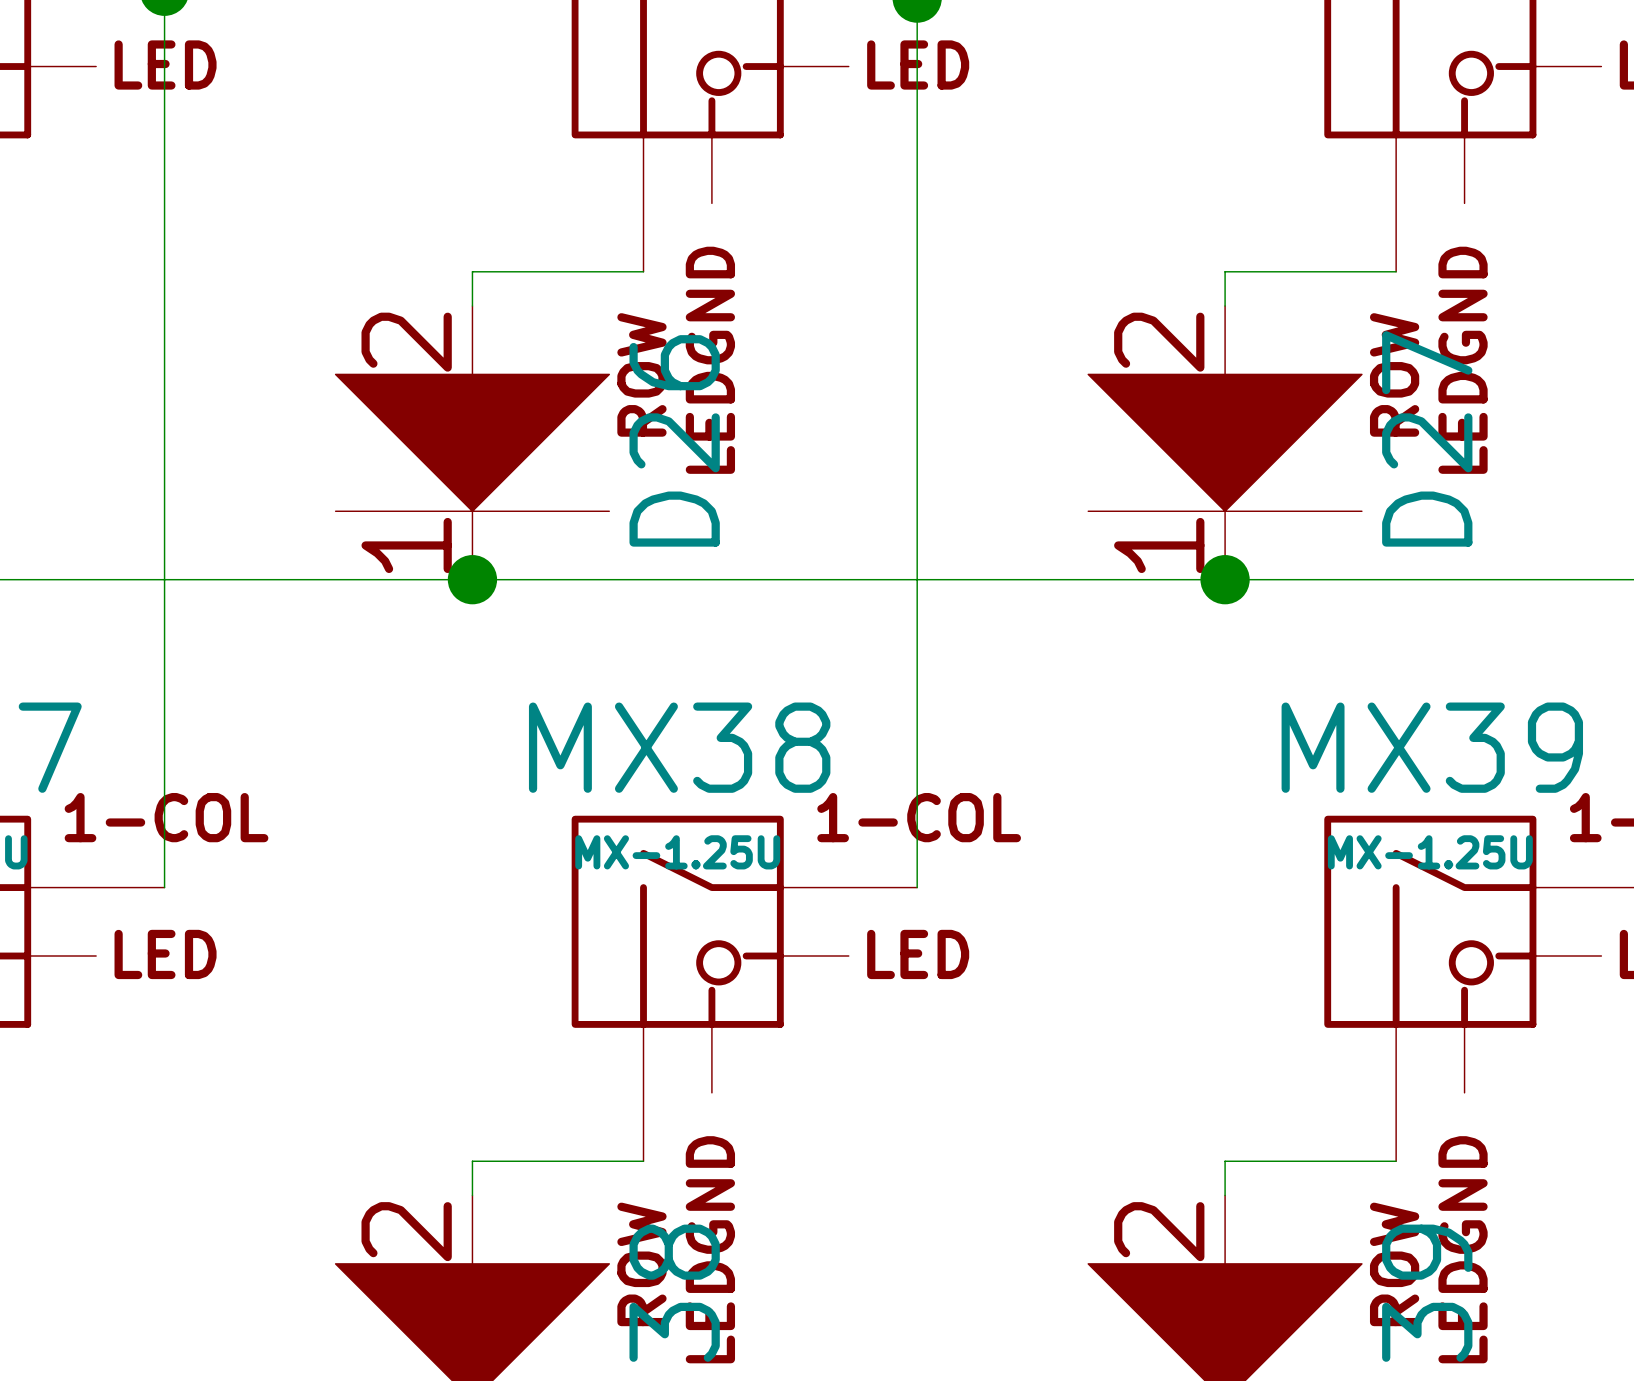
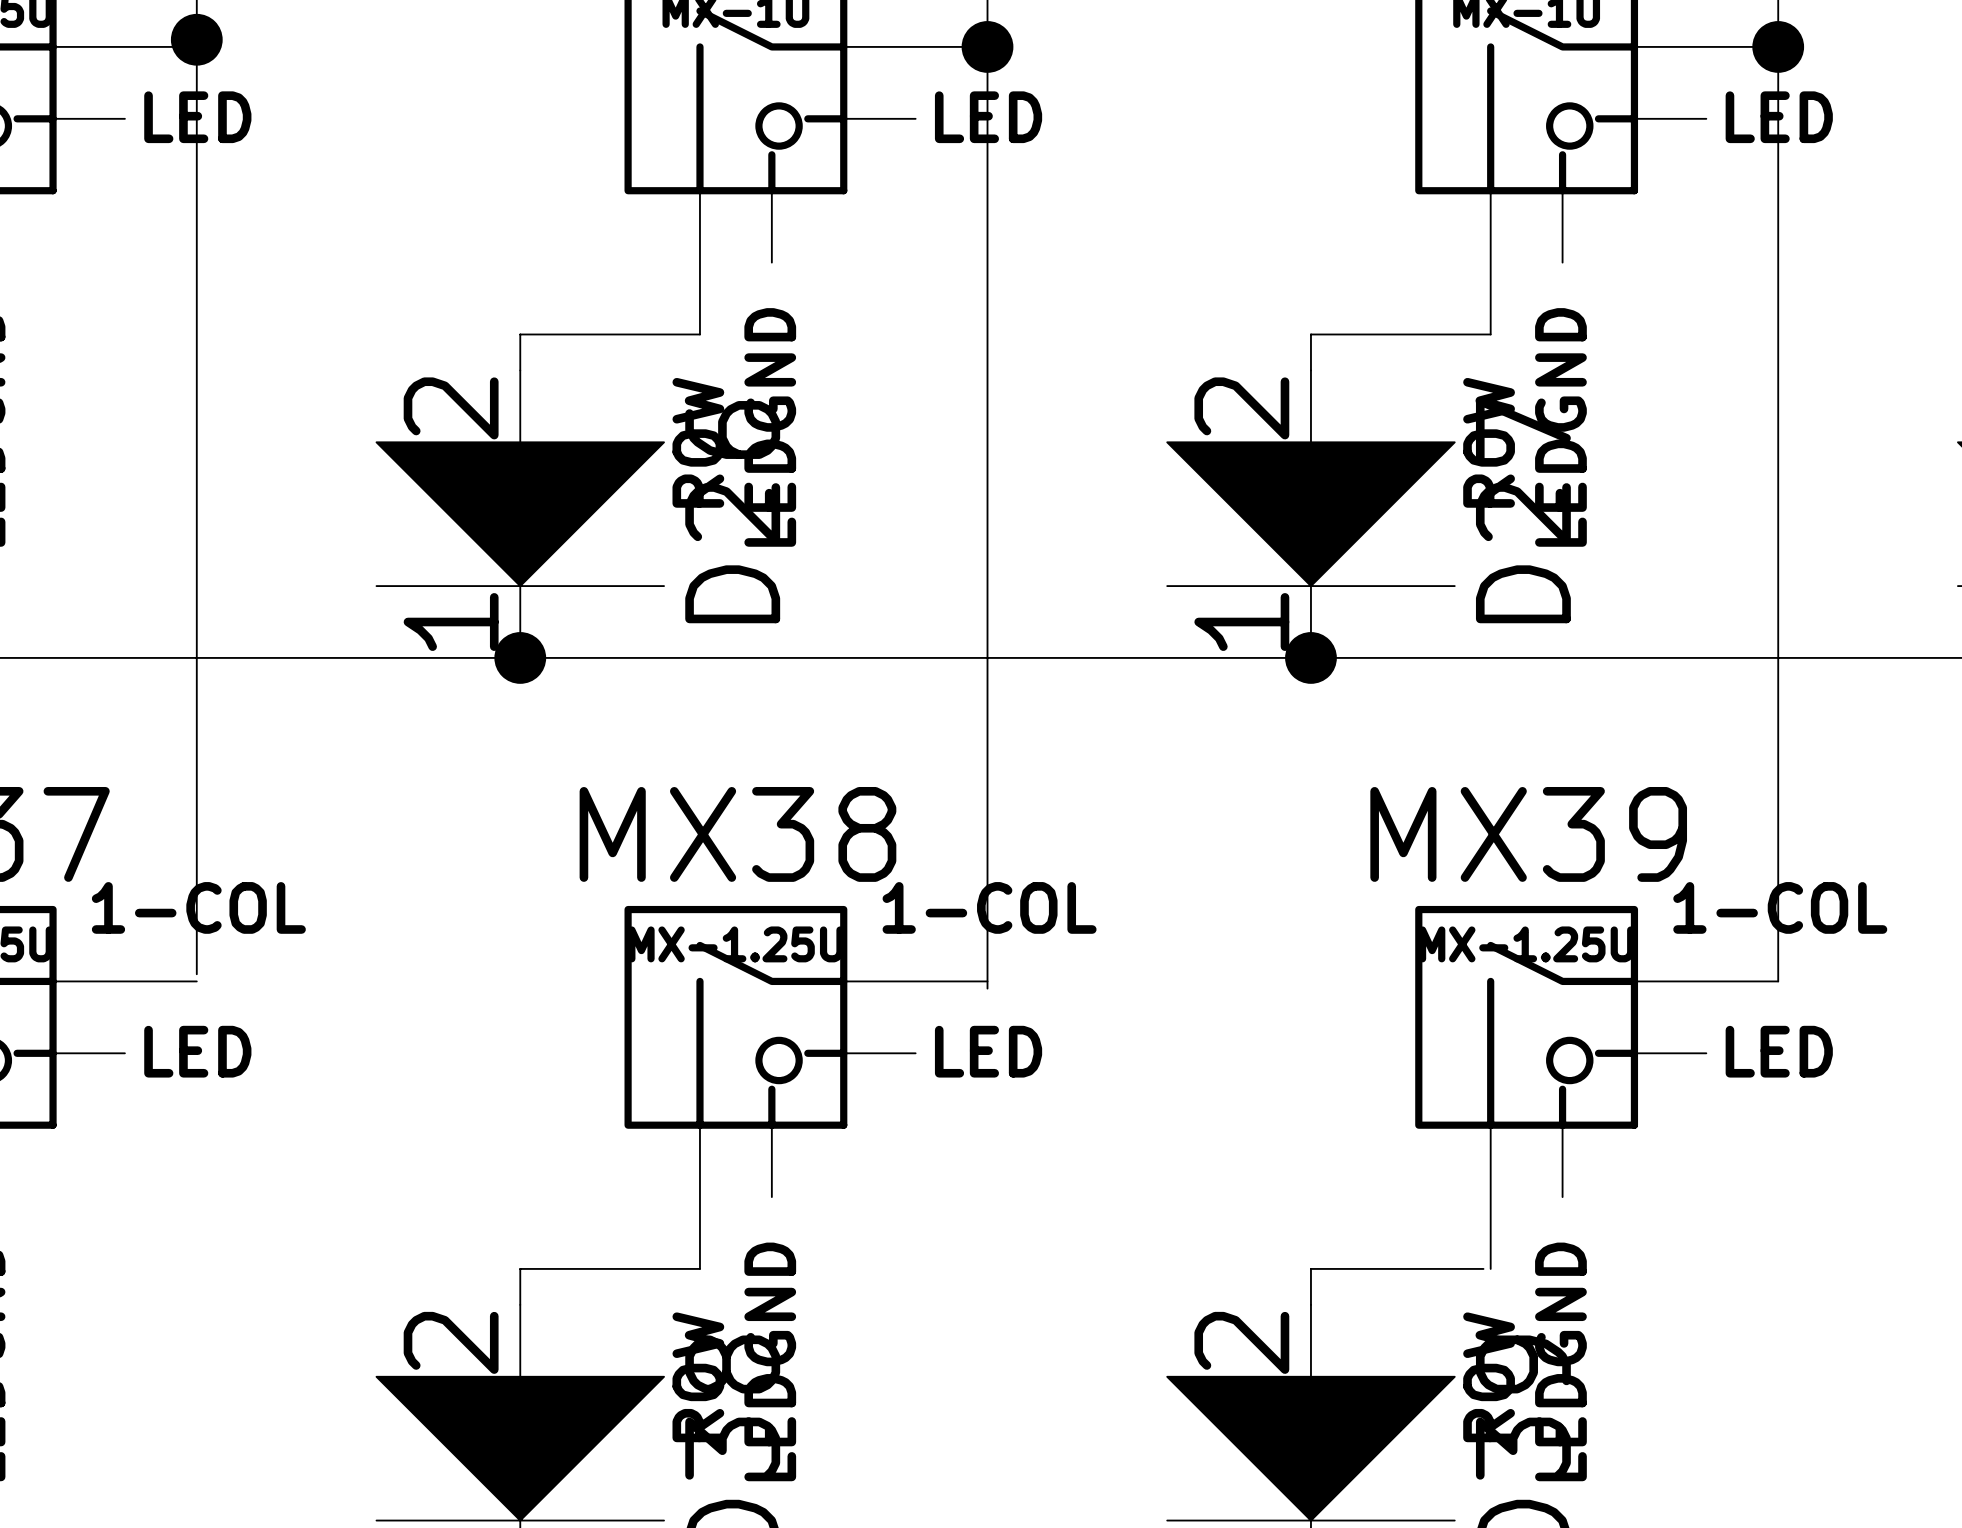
wire: (164, 880) (164, 887) -> (987, 981) (987, 988)
wire: (1389, 1161) (1396, 1161) -> none

